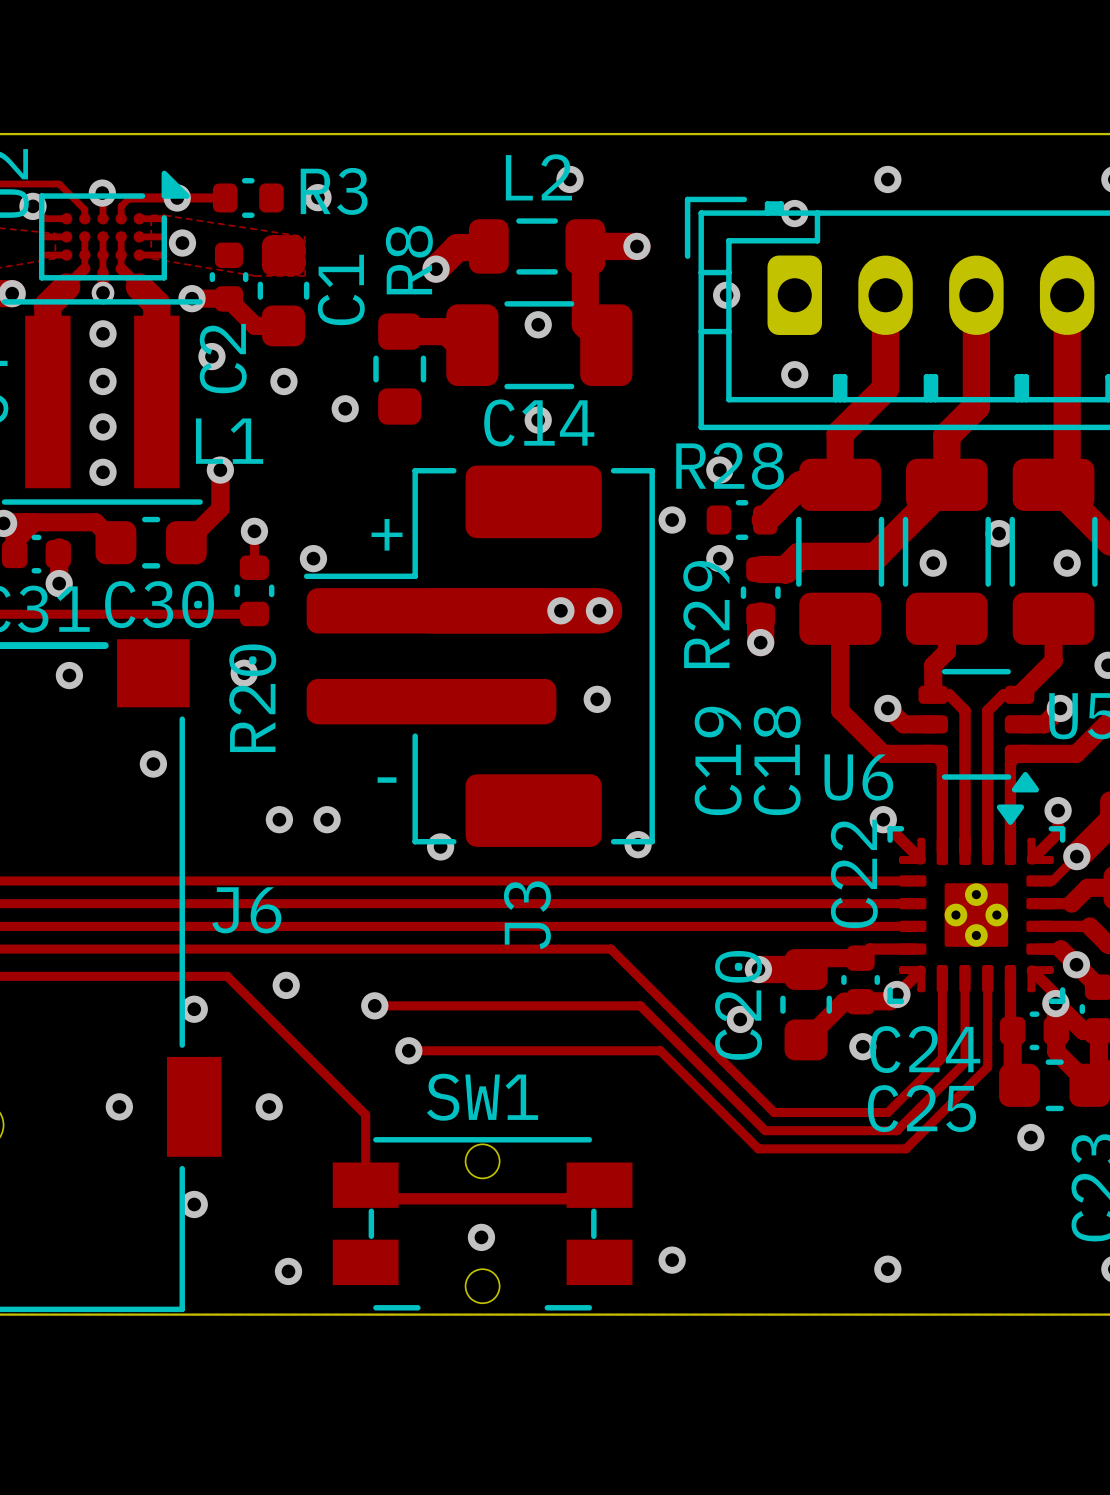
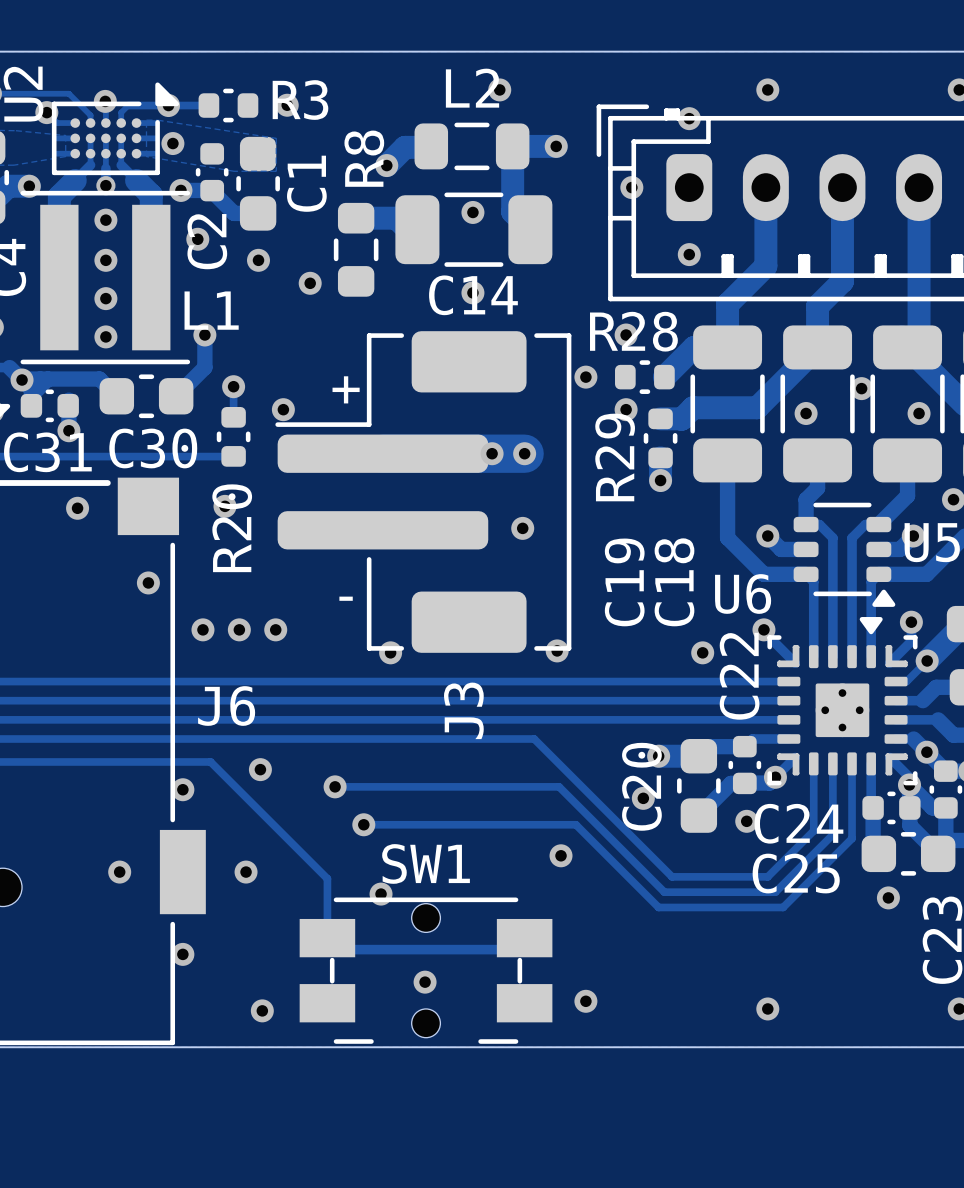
via: none -> (202, 629)
via: none -> (239, 629)
via: (279, 819) -> none
via: none -> (275, 629)
via: (327, 819) -> none
via: none -> (702, 652)
via: none -> (561, 855)
via: none -> (381, 894)

